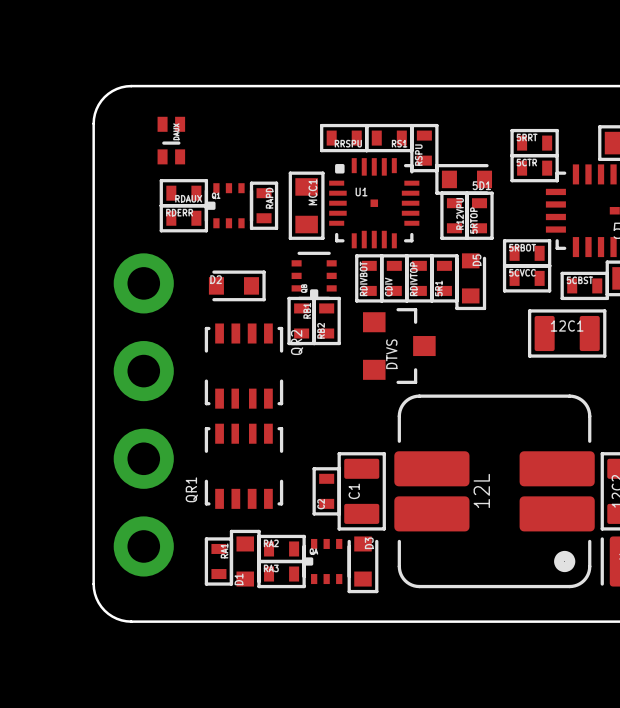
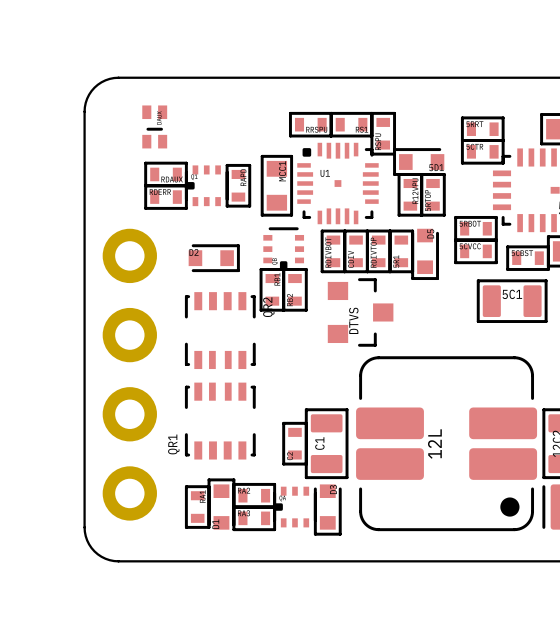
12C1 name: 12C1 (567, 325) -> 5C1 (512, 294)

